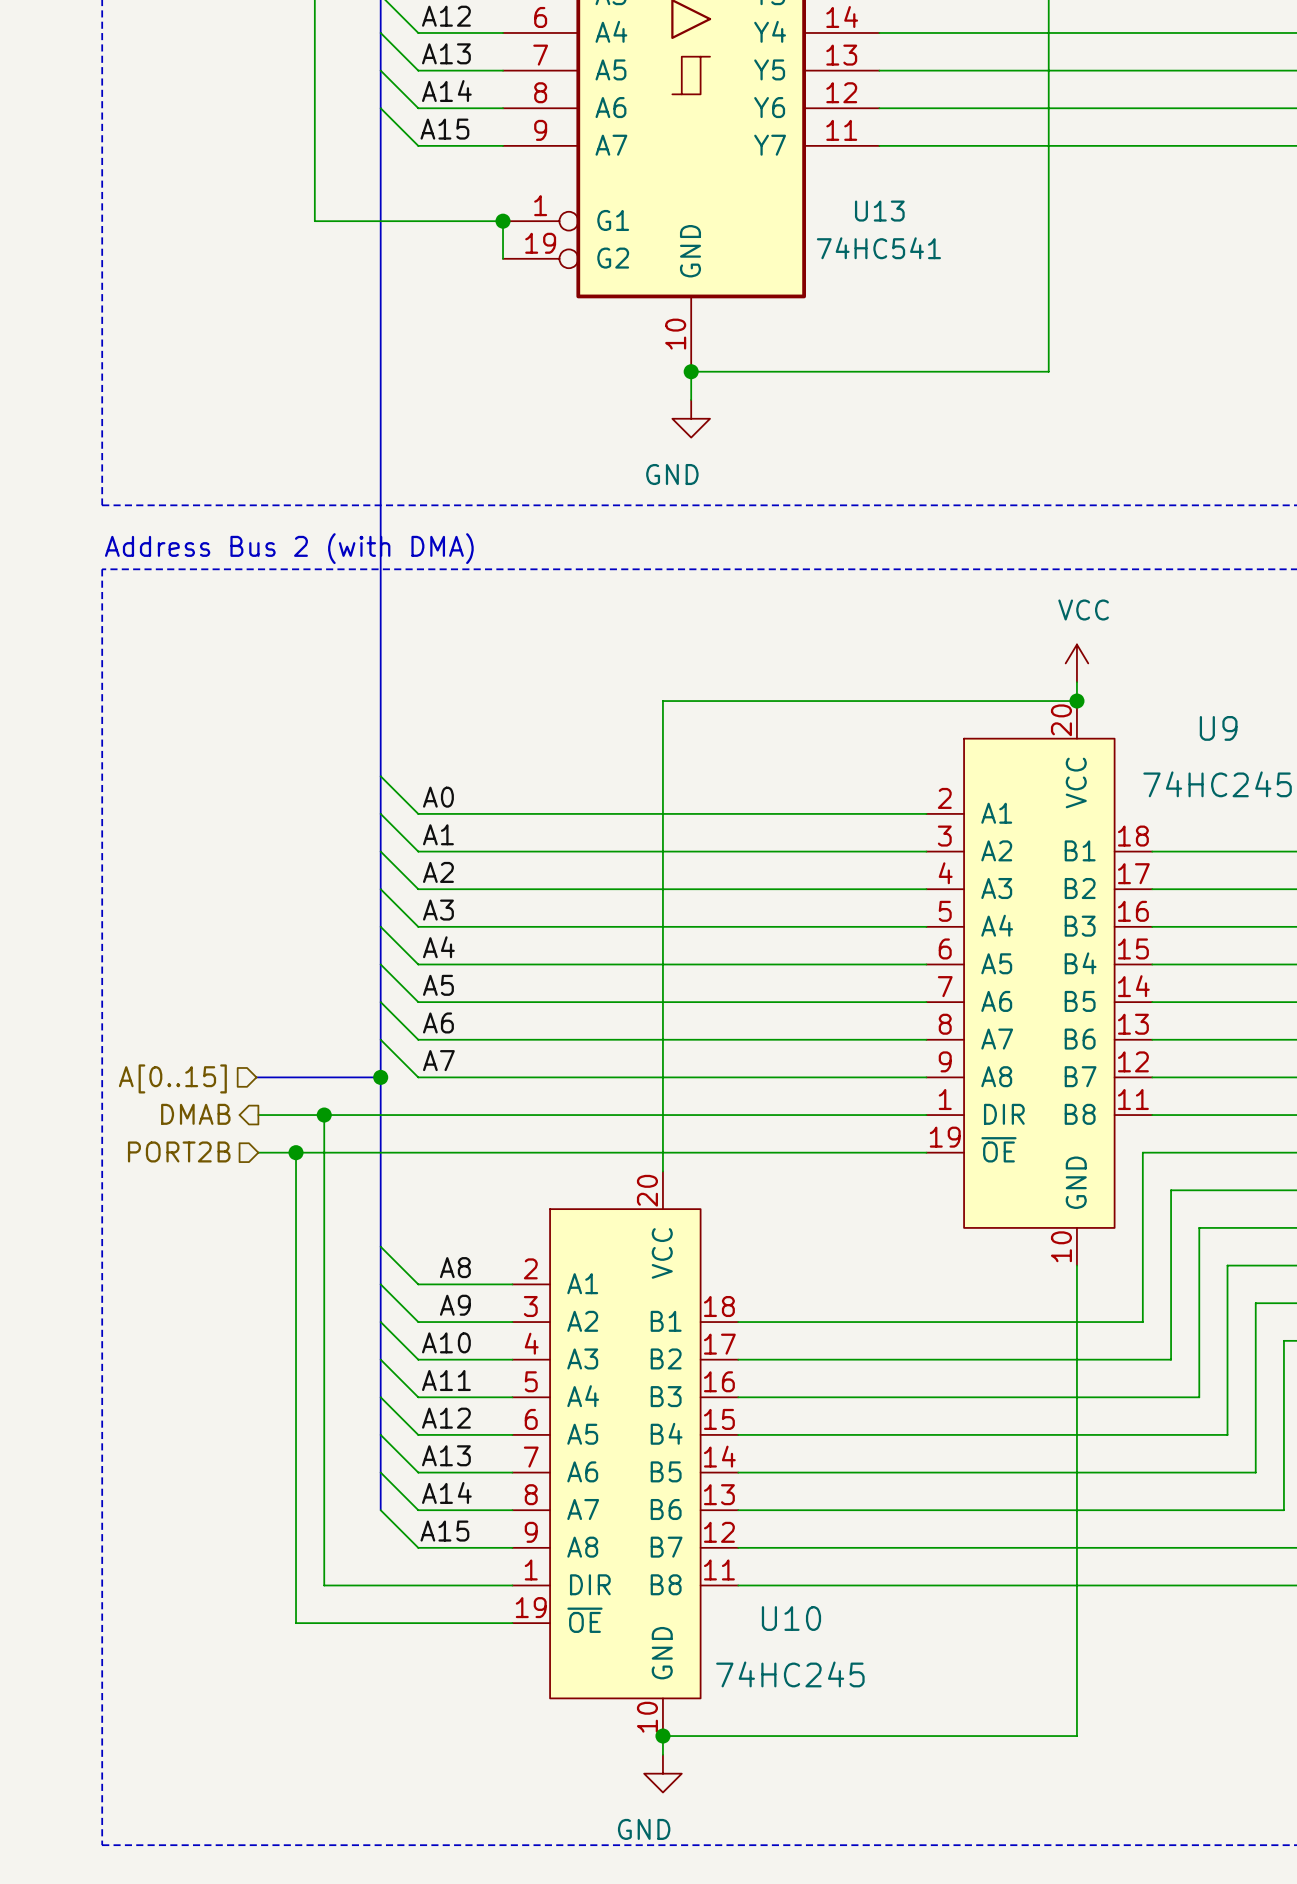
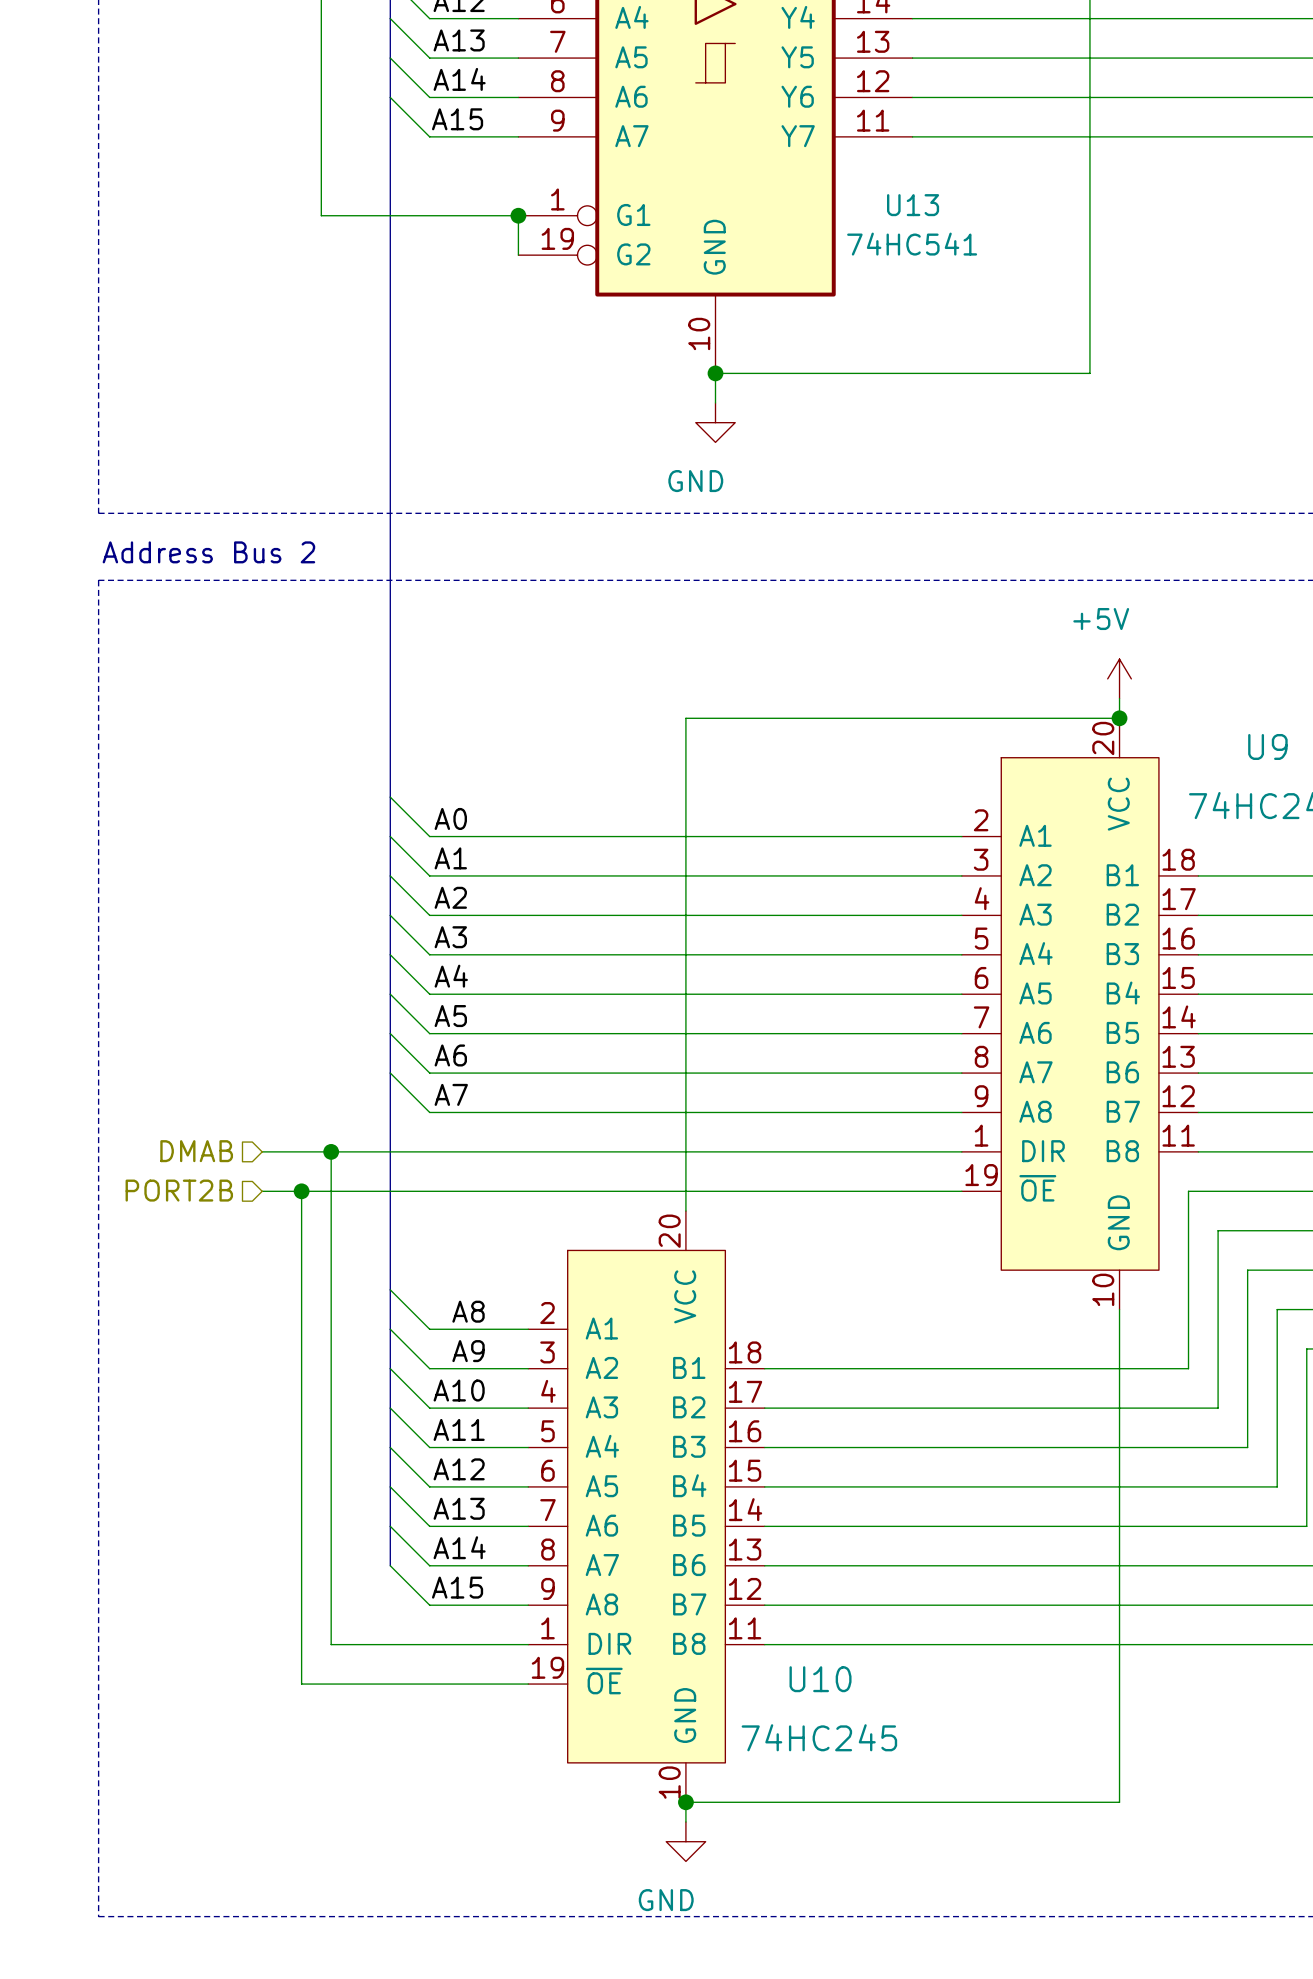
text: Address Bus 2 (with DMA) (289, 548) -> Address Bus 2 (208, 552)
power symbol: VCC (1076, 663) -> +5V (1119, 678)
bus: (256, 1077) (380, 1077) -> none
junction: (380, 1077) -> none
hierarchical label: A[0..15] (172, 1078) -> none
hierarchical label shape: output (195, 1114) -> input (196, 1151)

